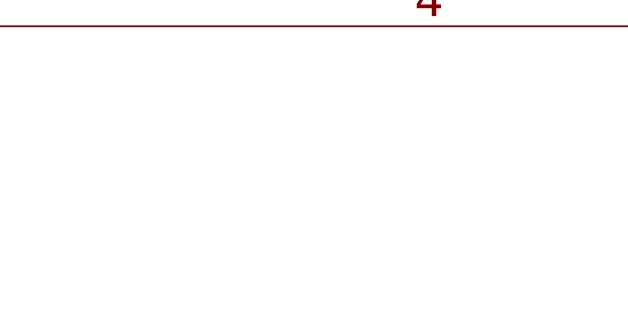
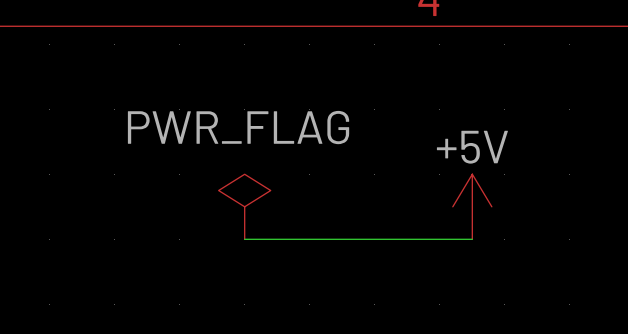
power symbol: none -> PWR_FLAG (244, 206)
power symbol: none -> +5V (472, 206)
wire: none -> (244, 239) (472, 239)

